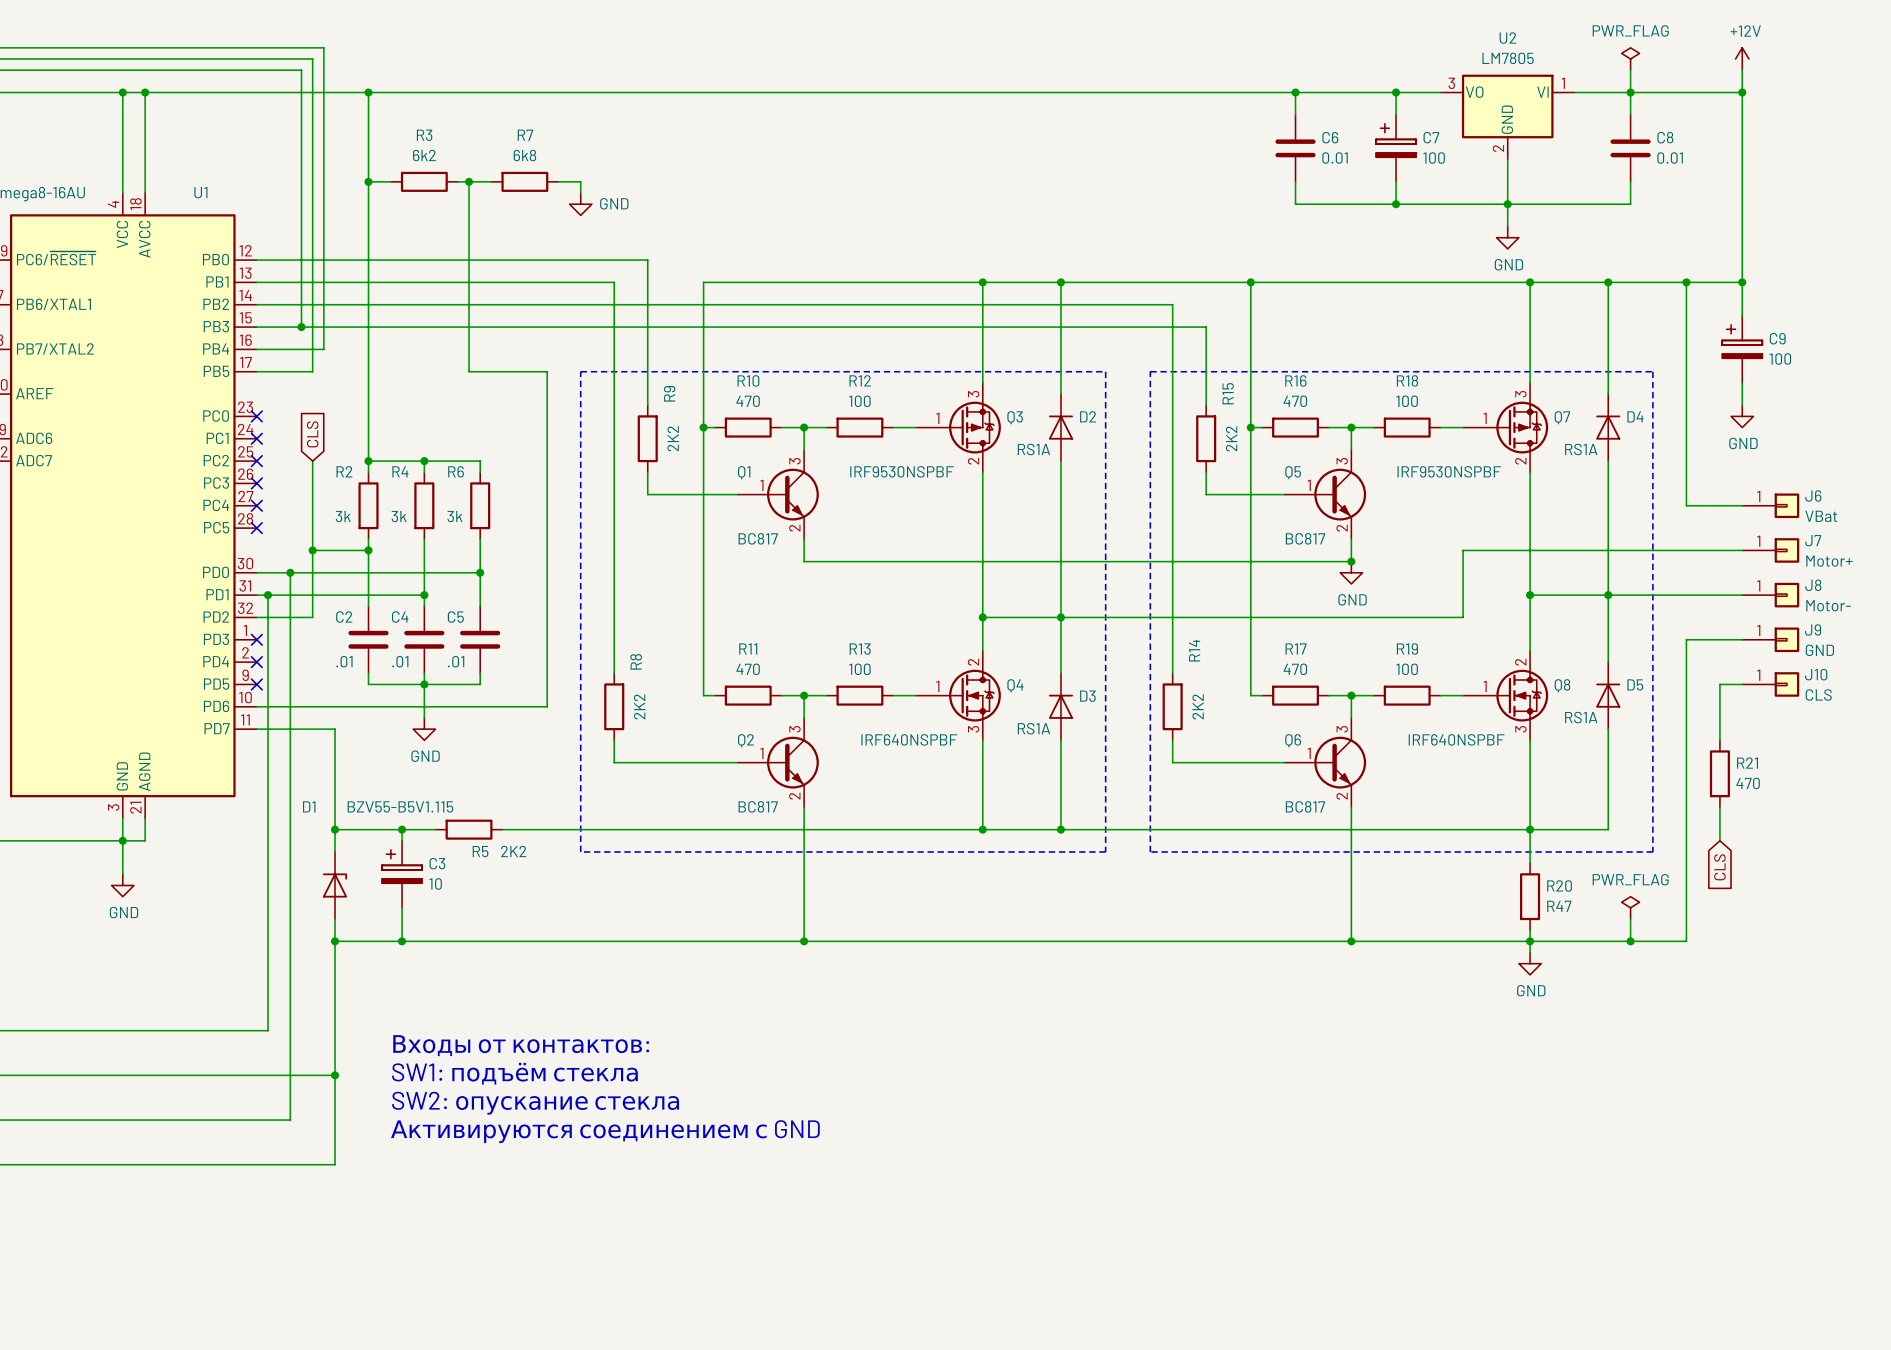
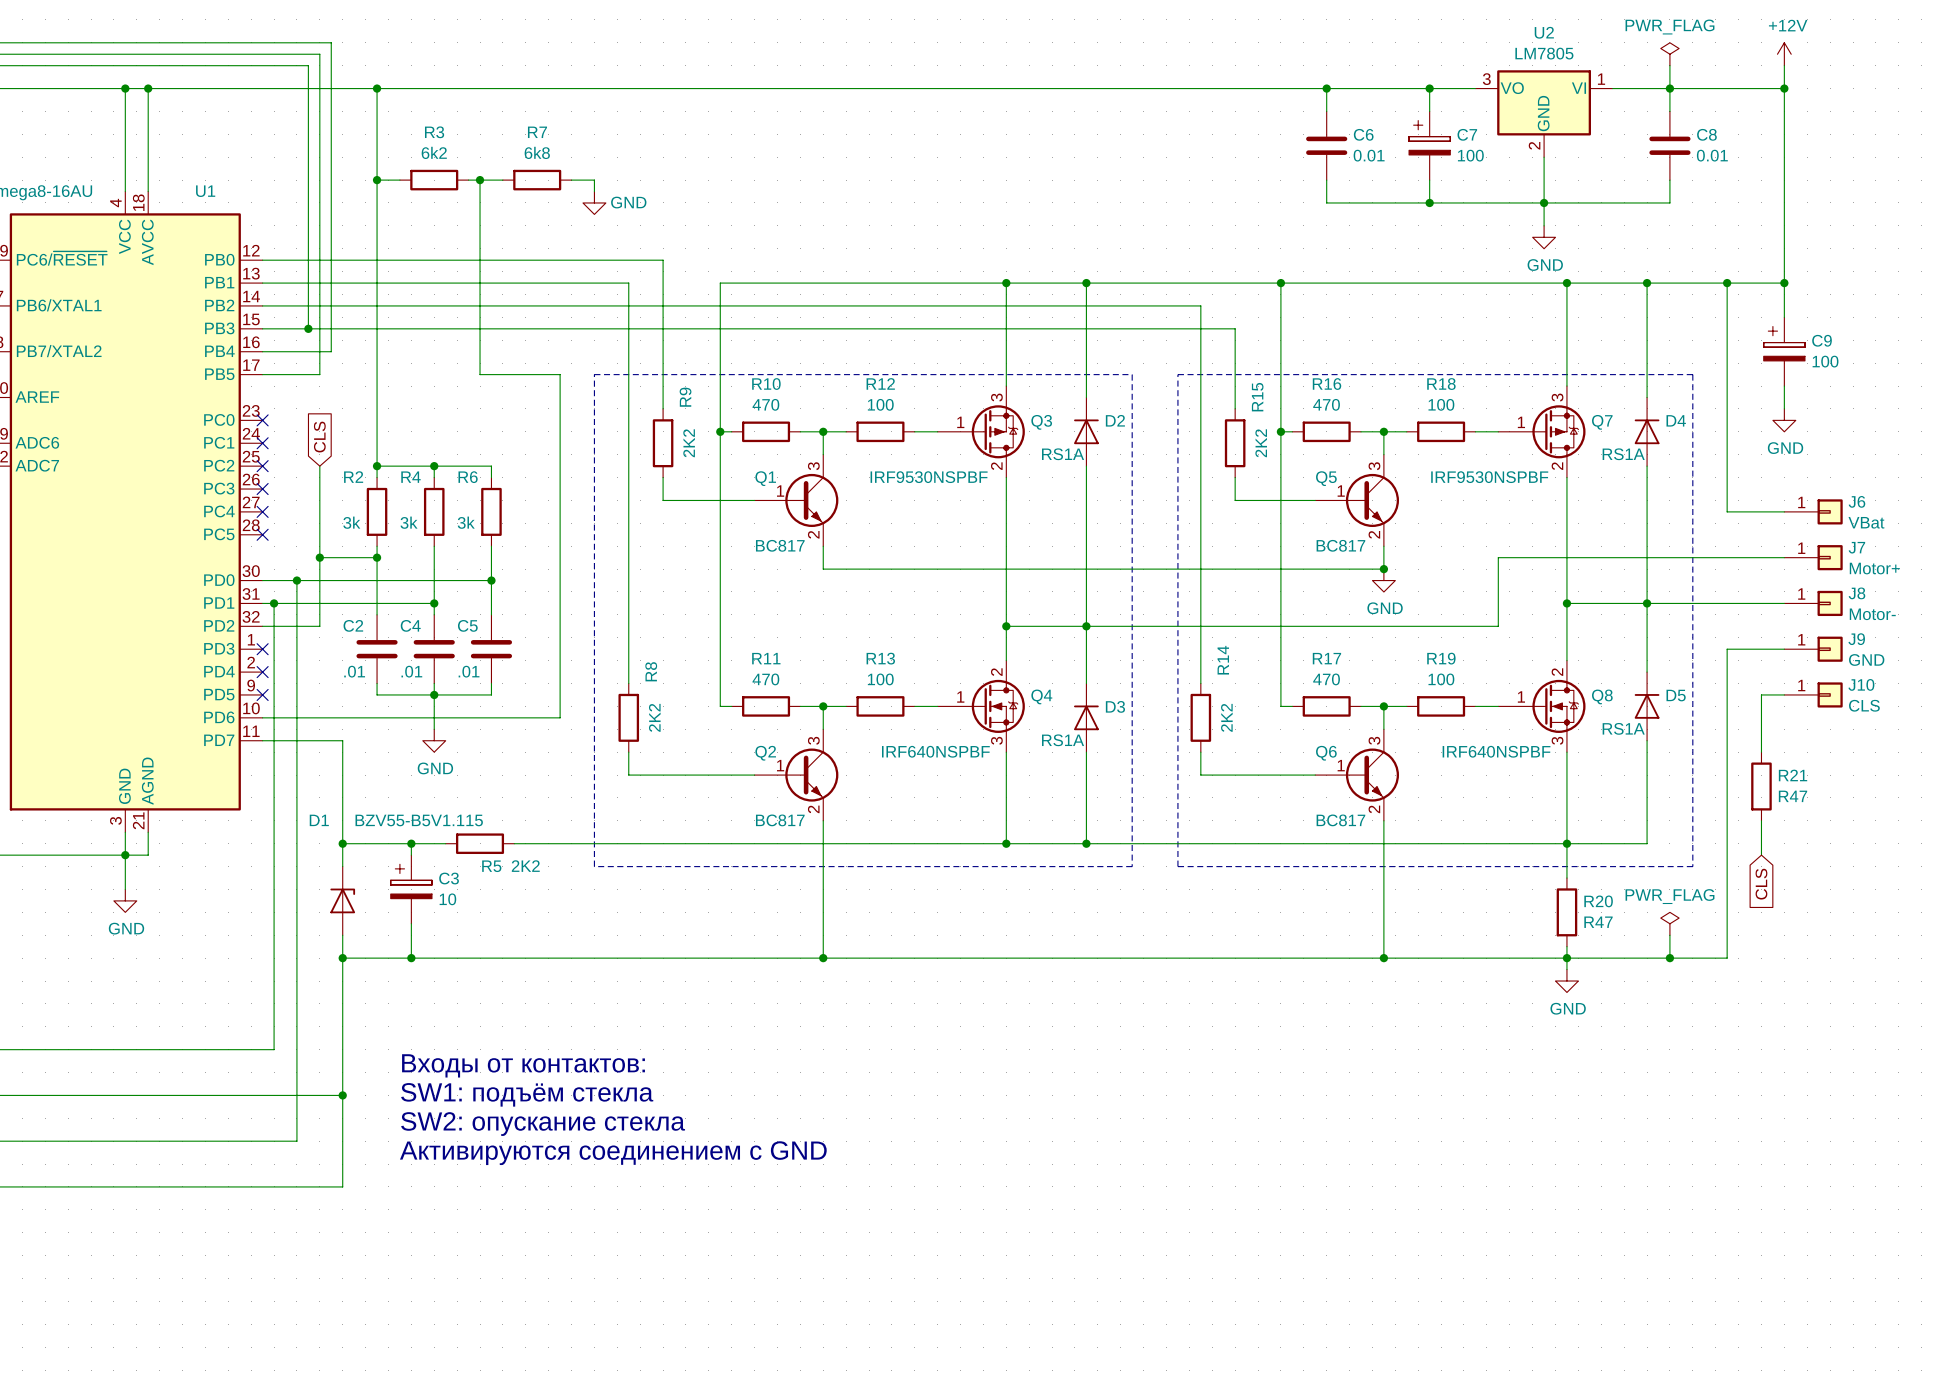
R21 value: 470 (1748, 783) -> R47 (1793, 796)

